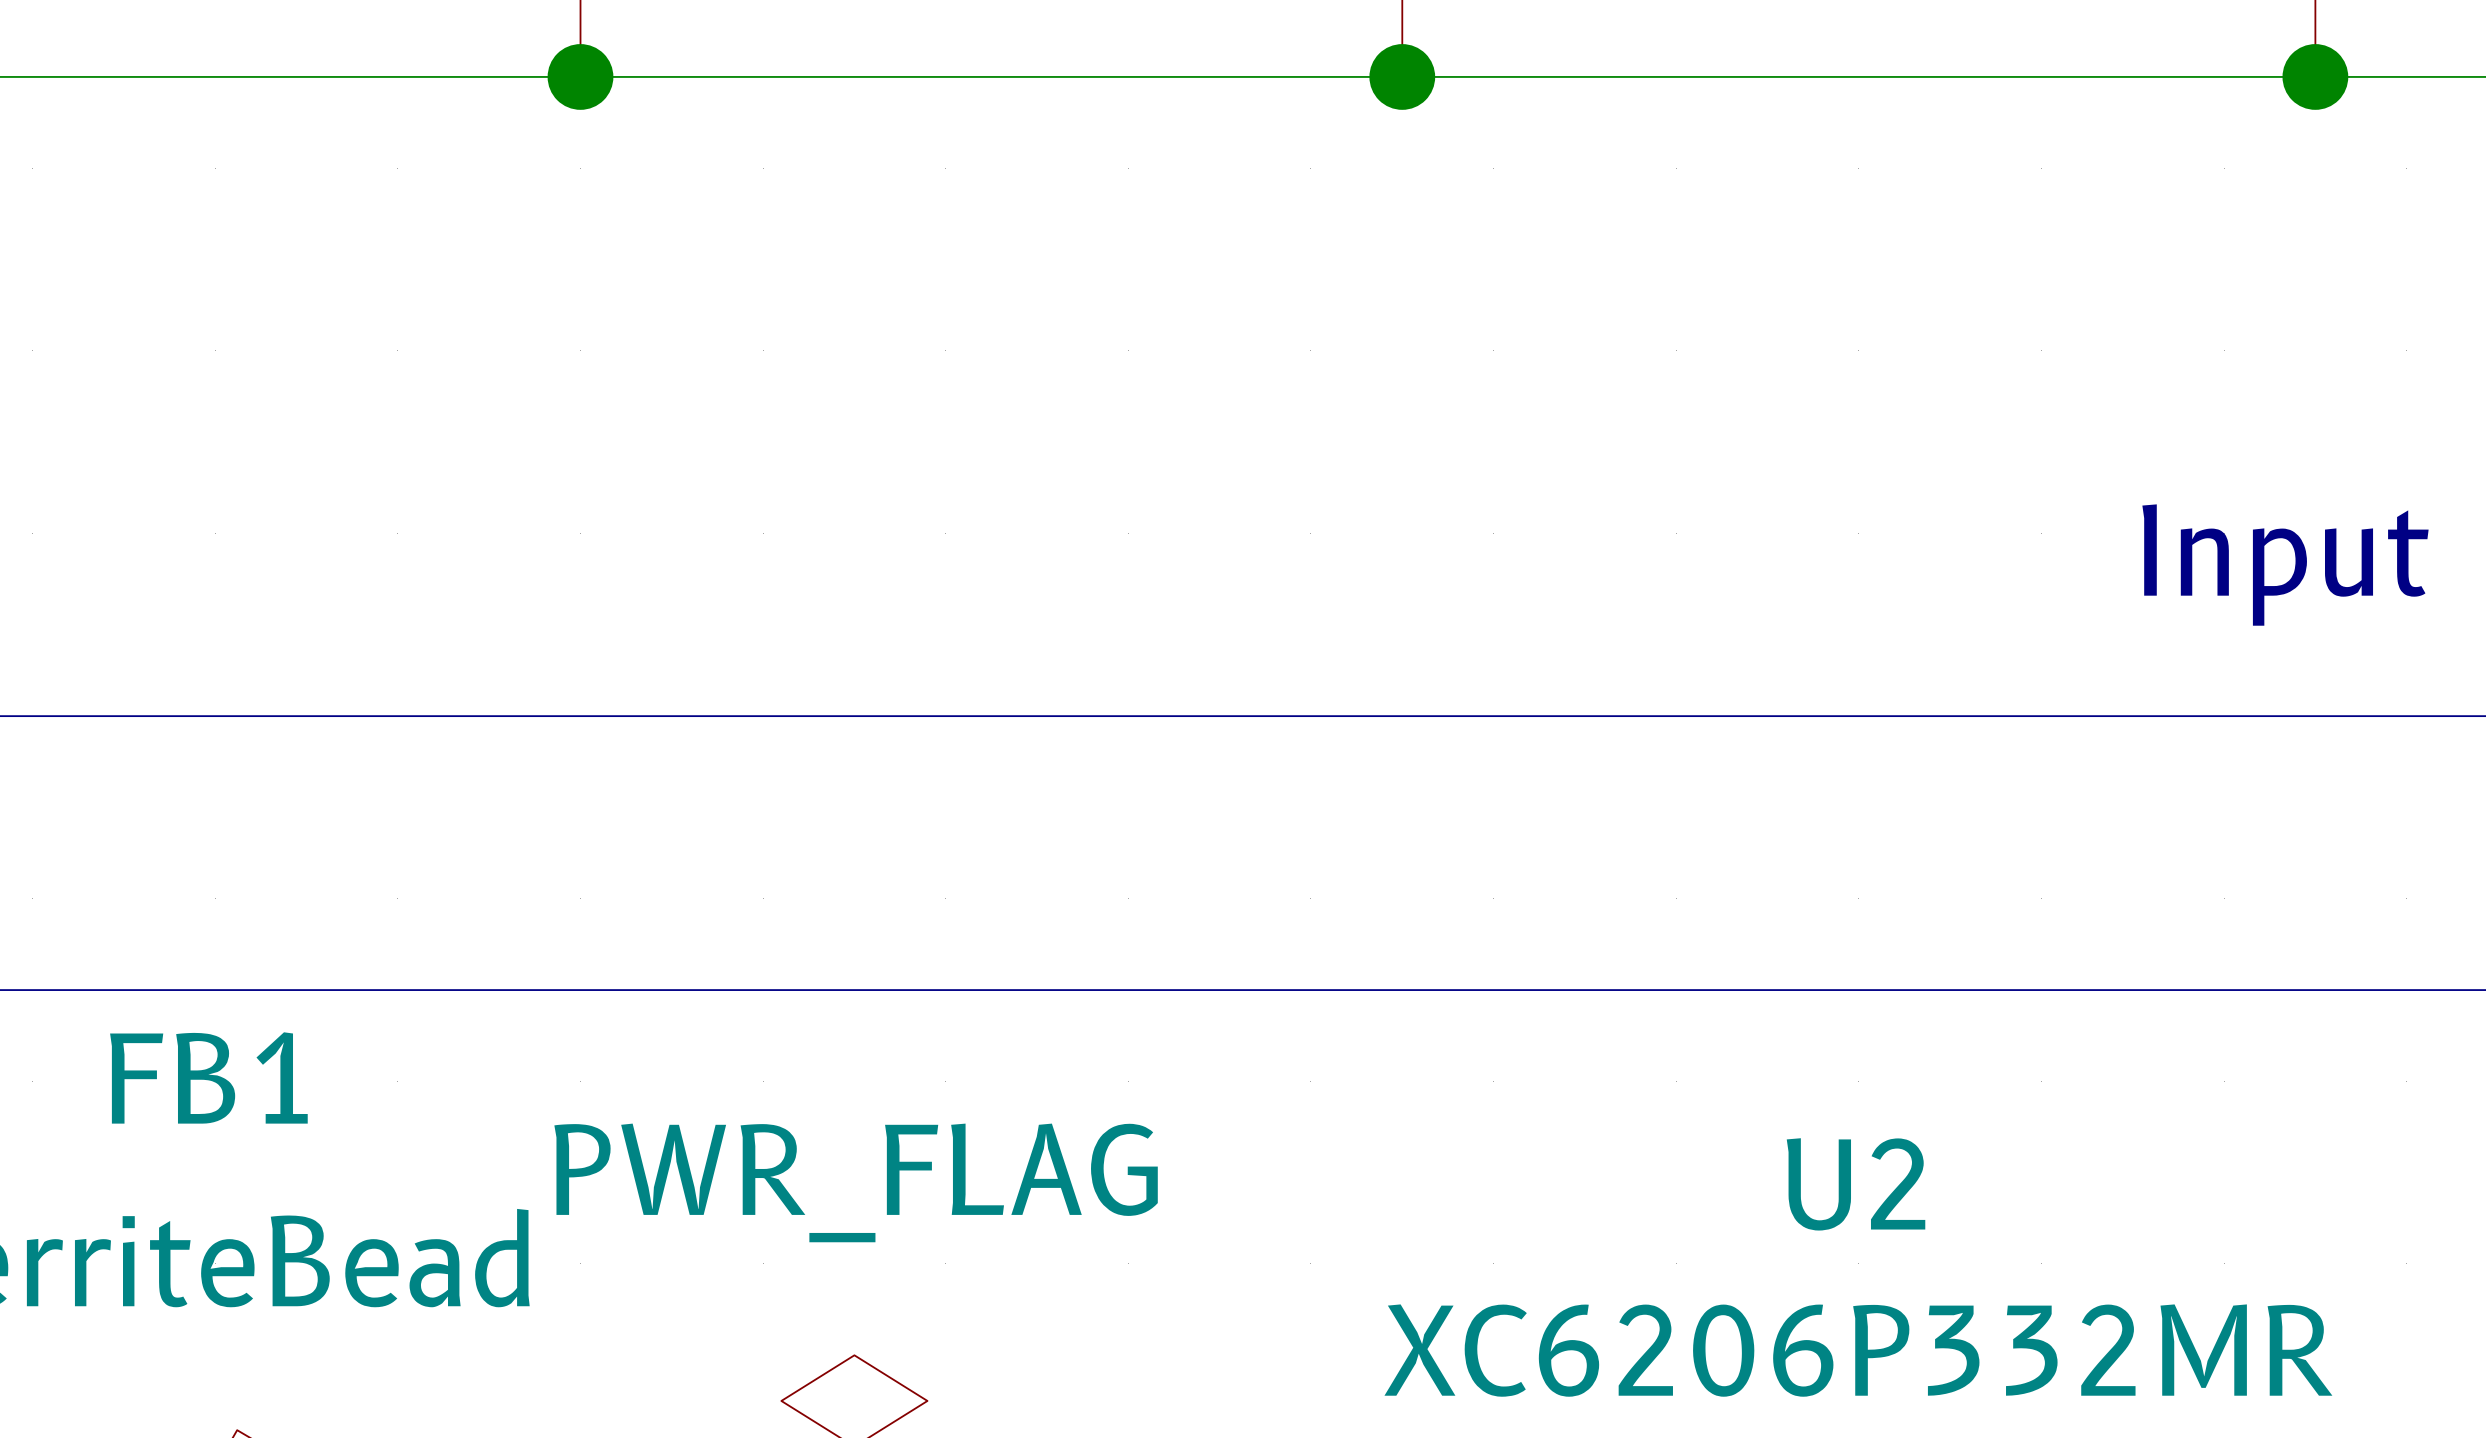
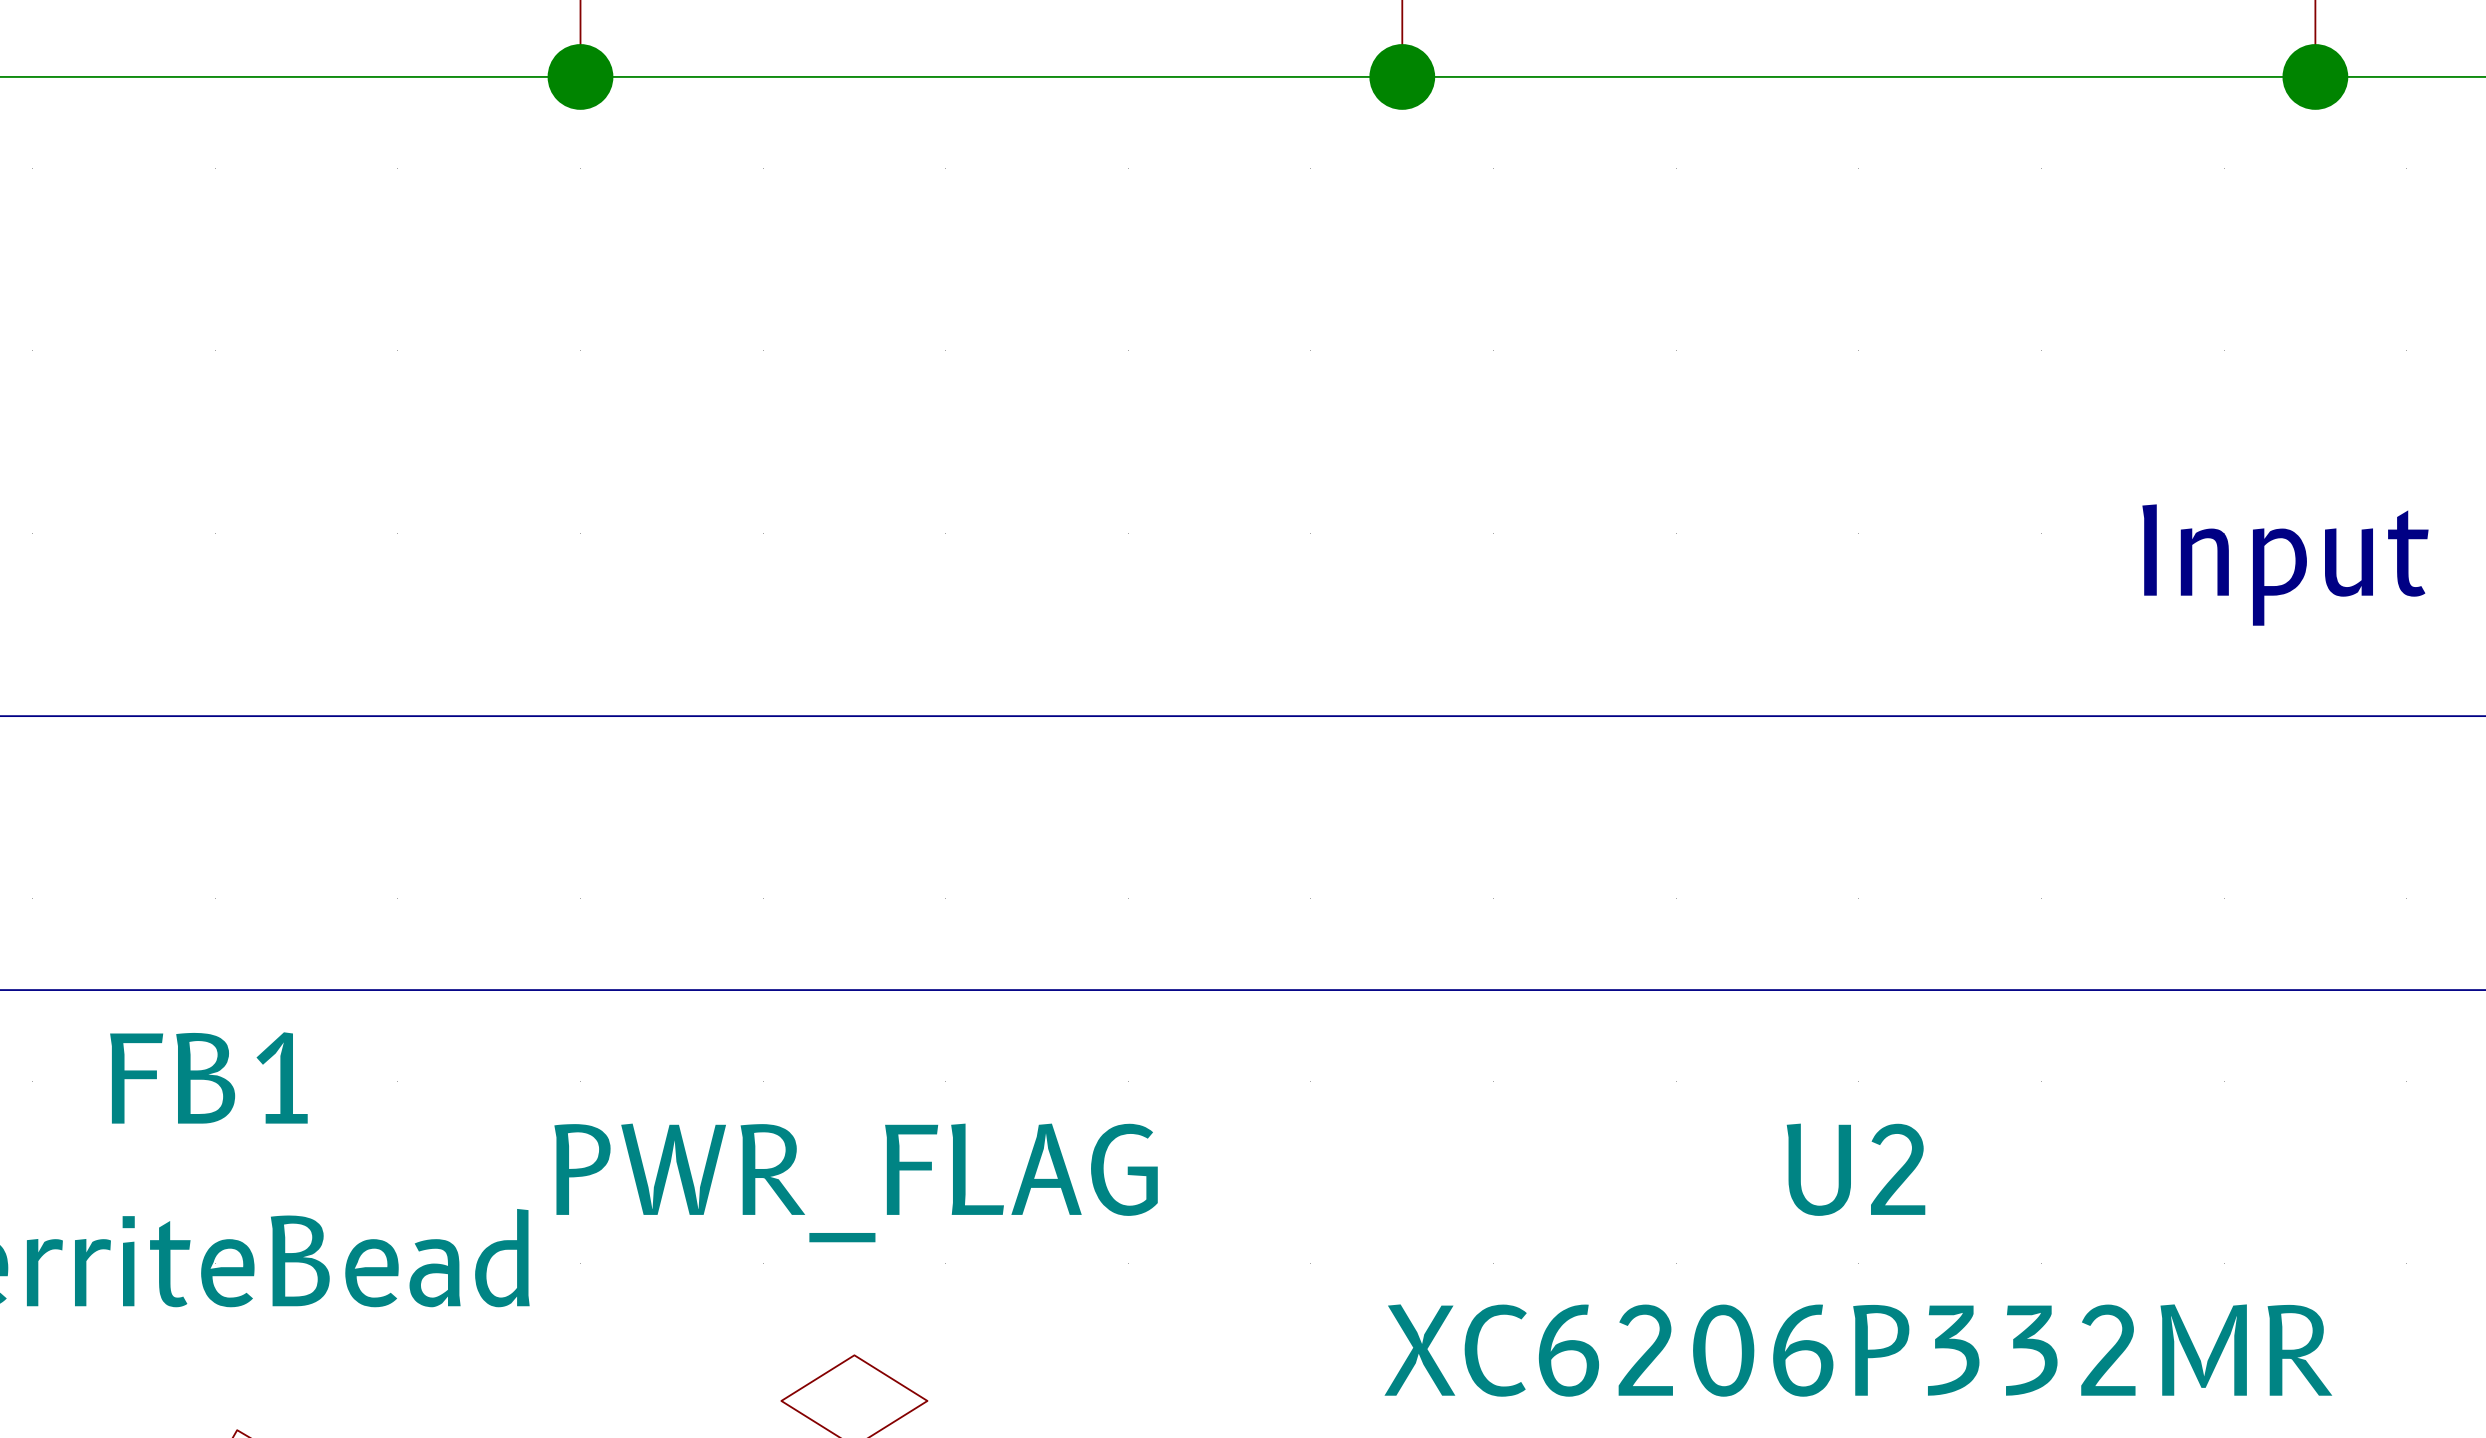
U2 name position: U2 (1856, 1184) -> U2 (1856, 1169)

